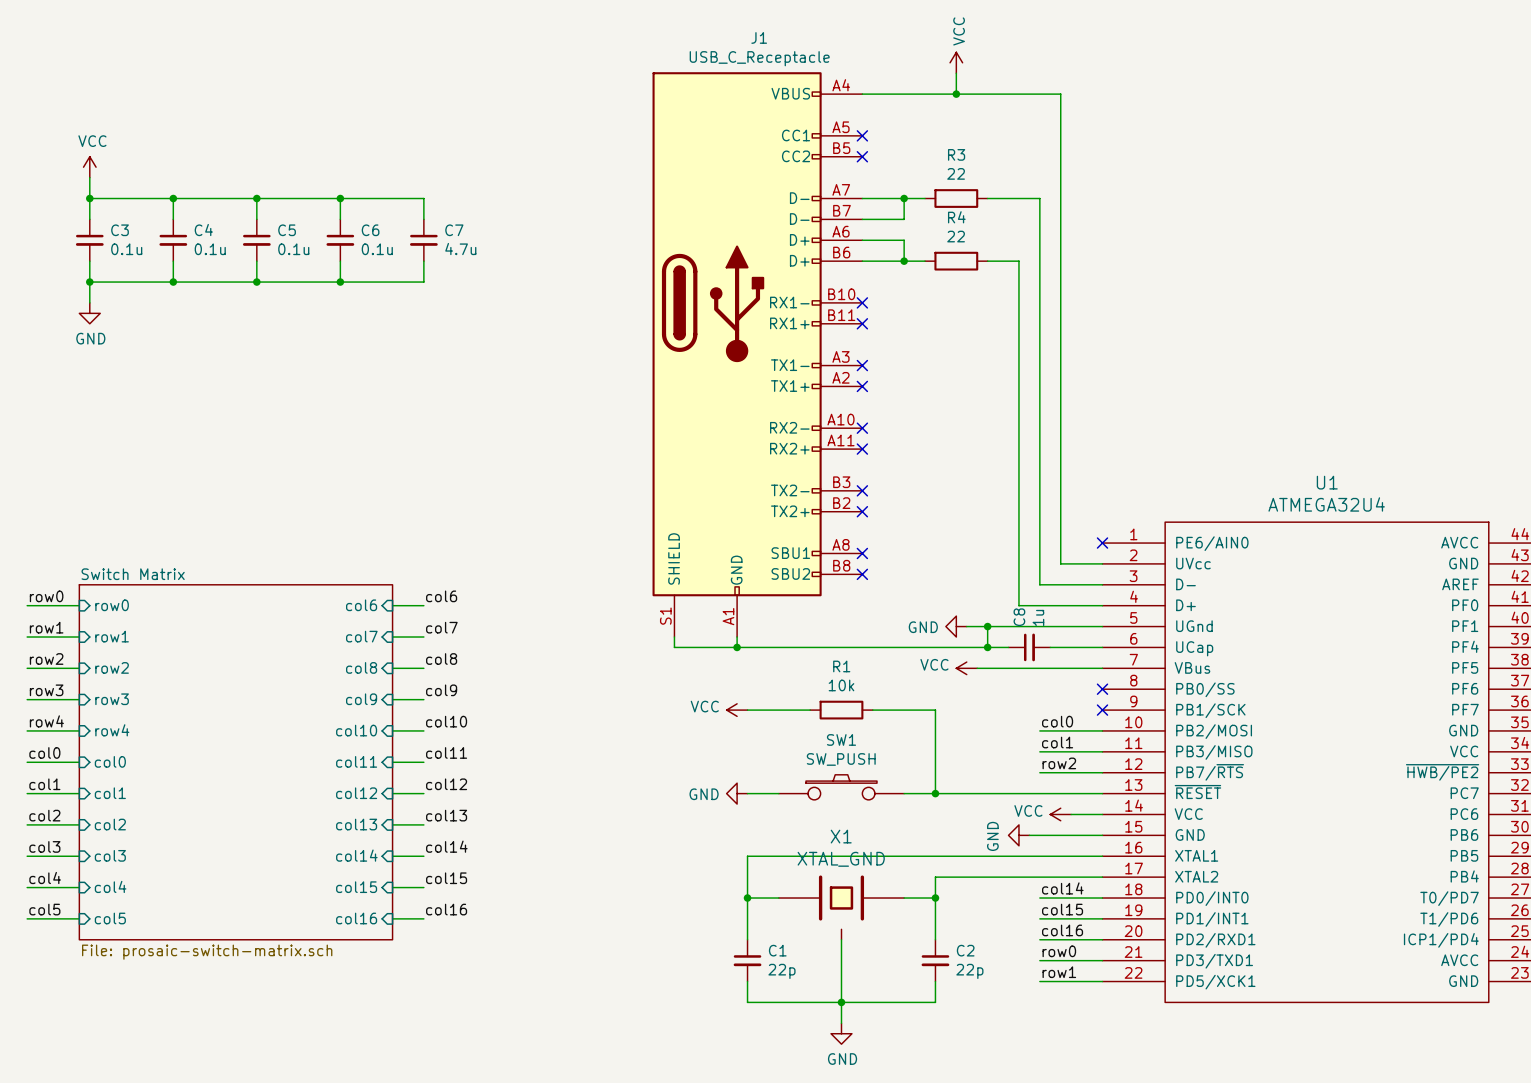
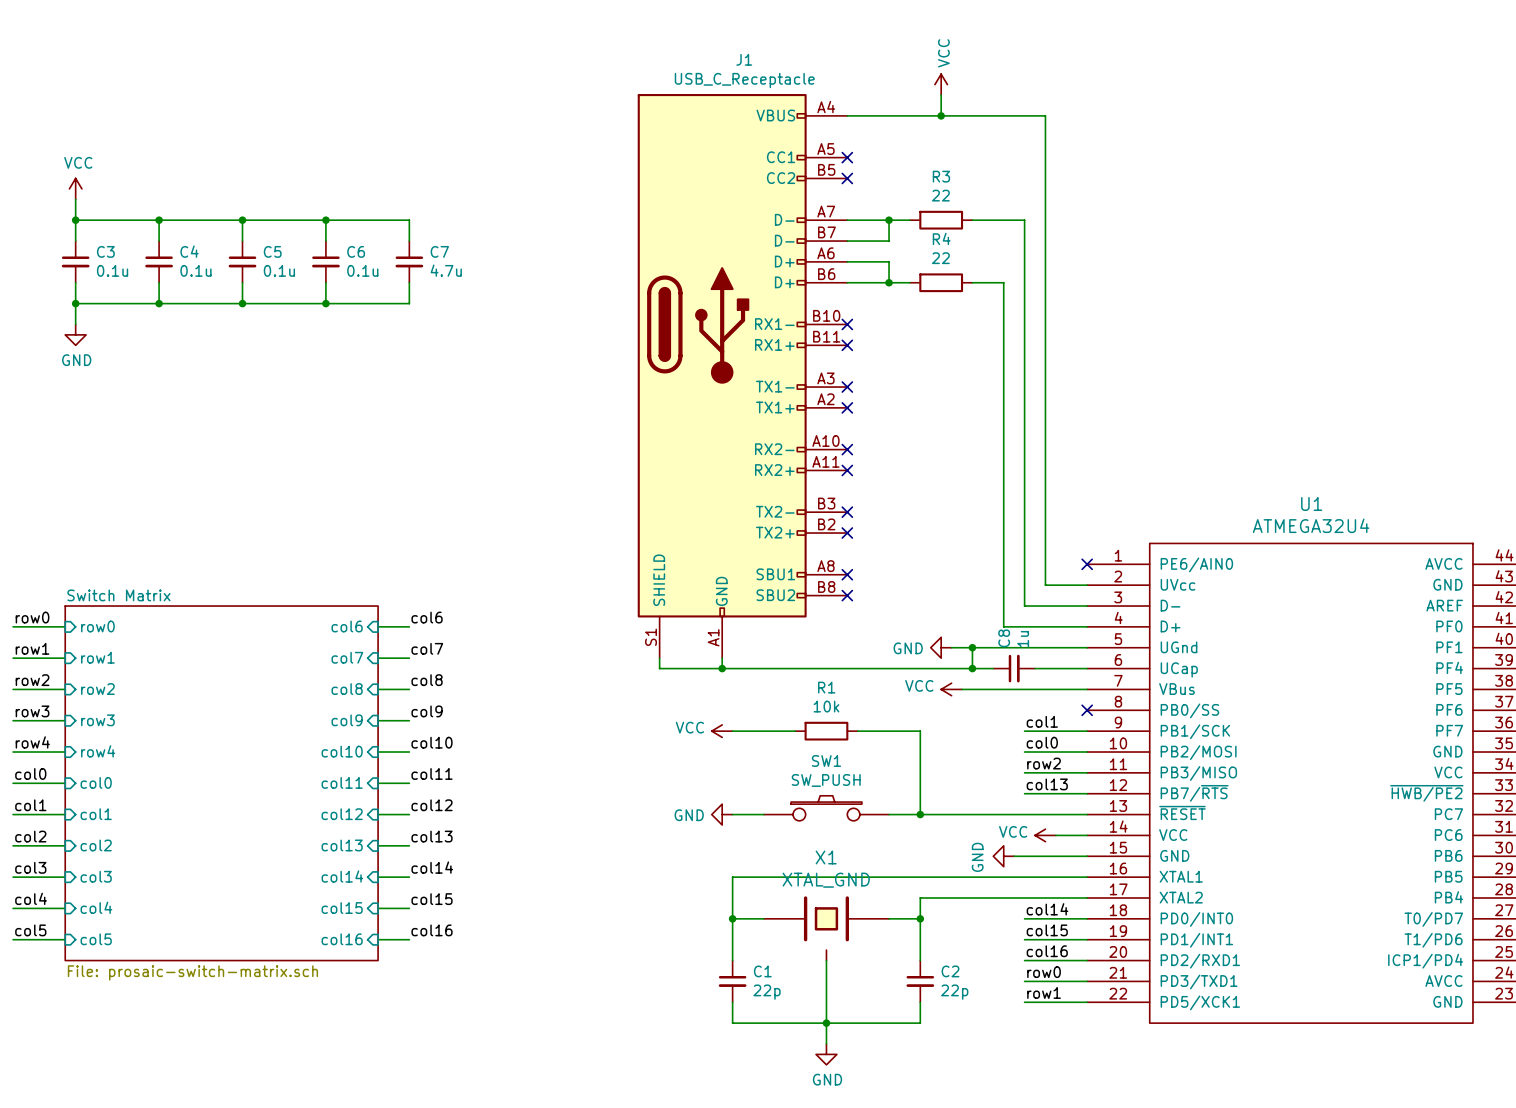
label: none -> col1 (1042, 721)
wire: none -> (1024, 731) (1087, 731)
no-connect mark: (1102, 710) -> none
label: col1 (1057, 742) -> row2 (1044, 763)
label: row2 (1059, 763) -> col13 (1047, 784)

